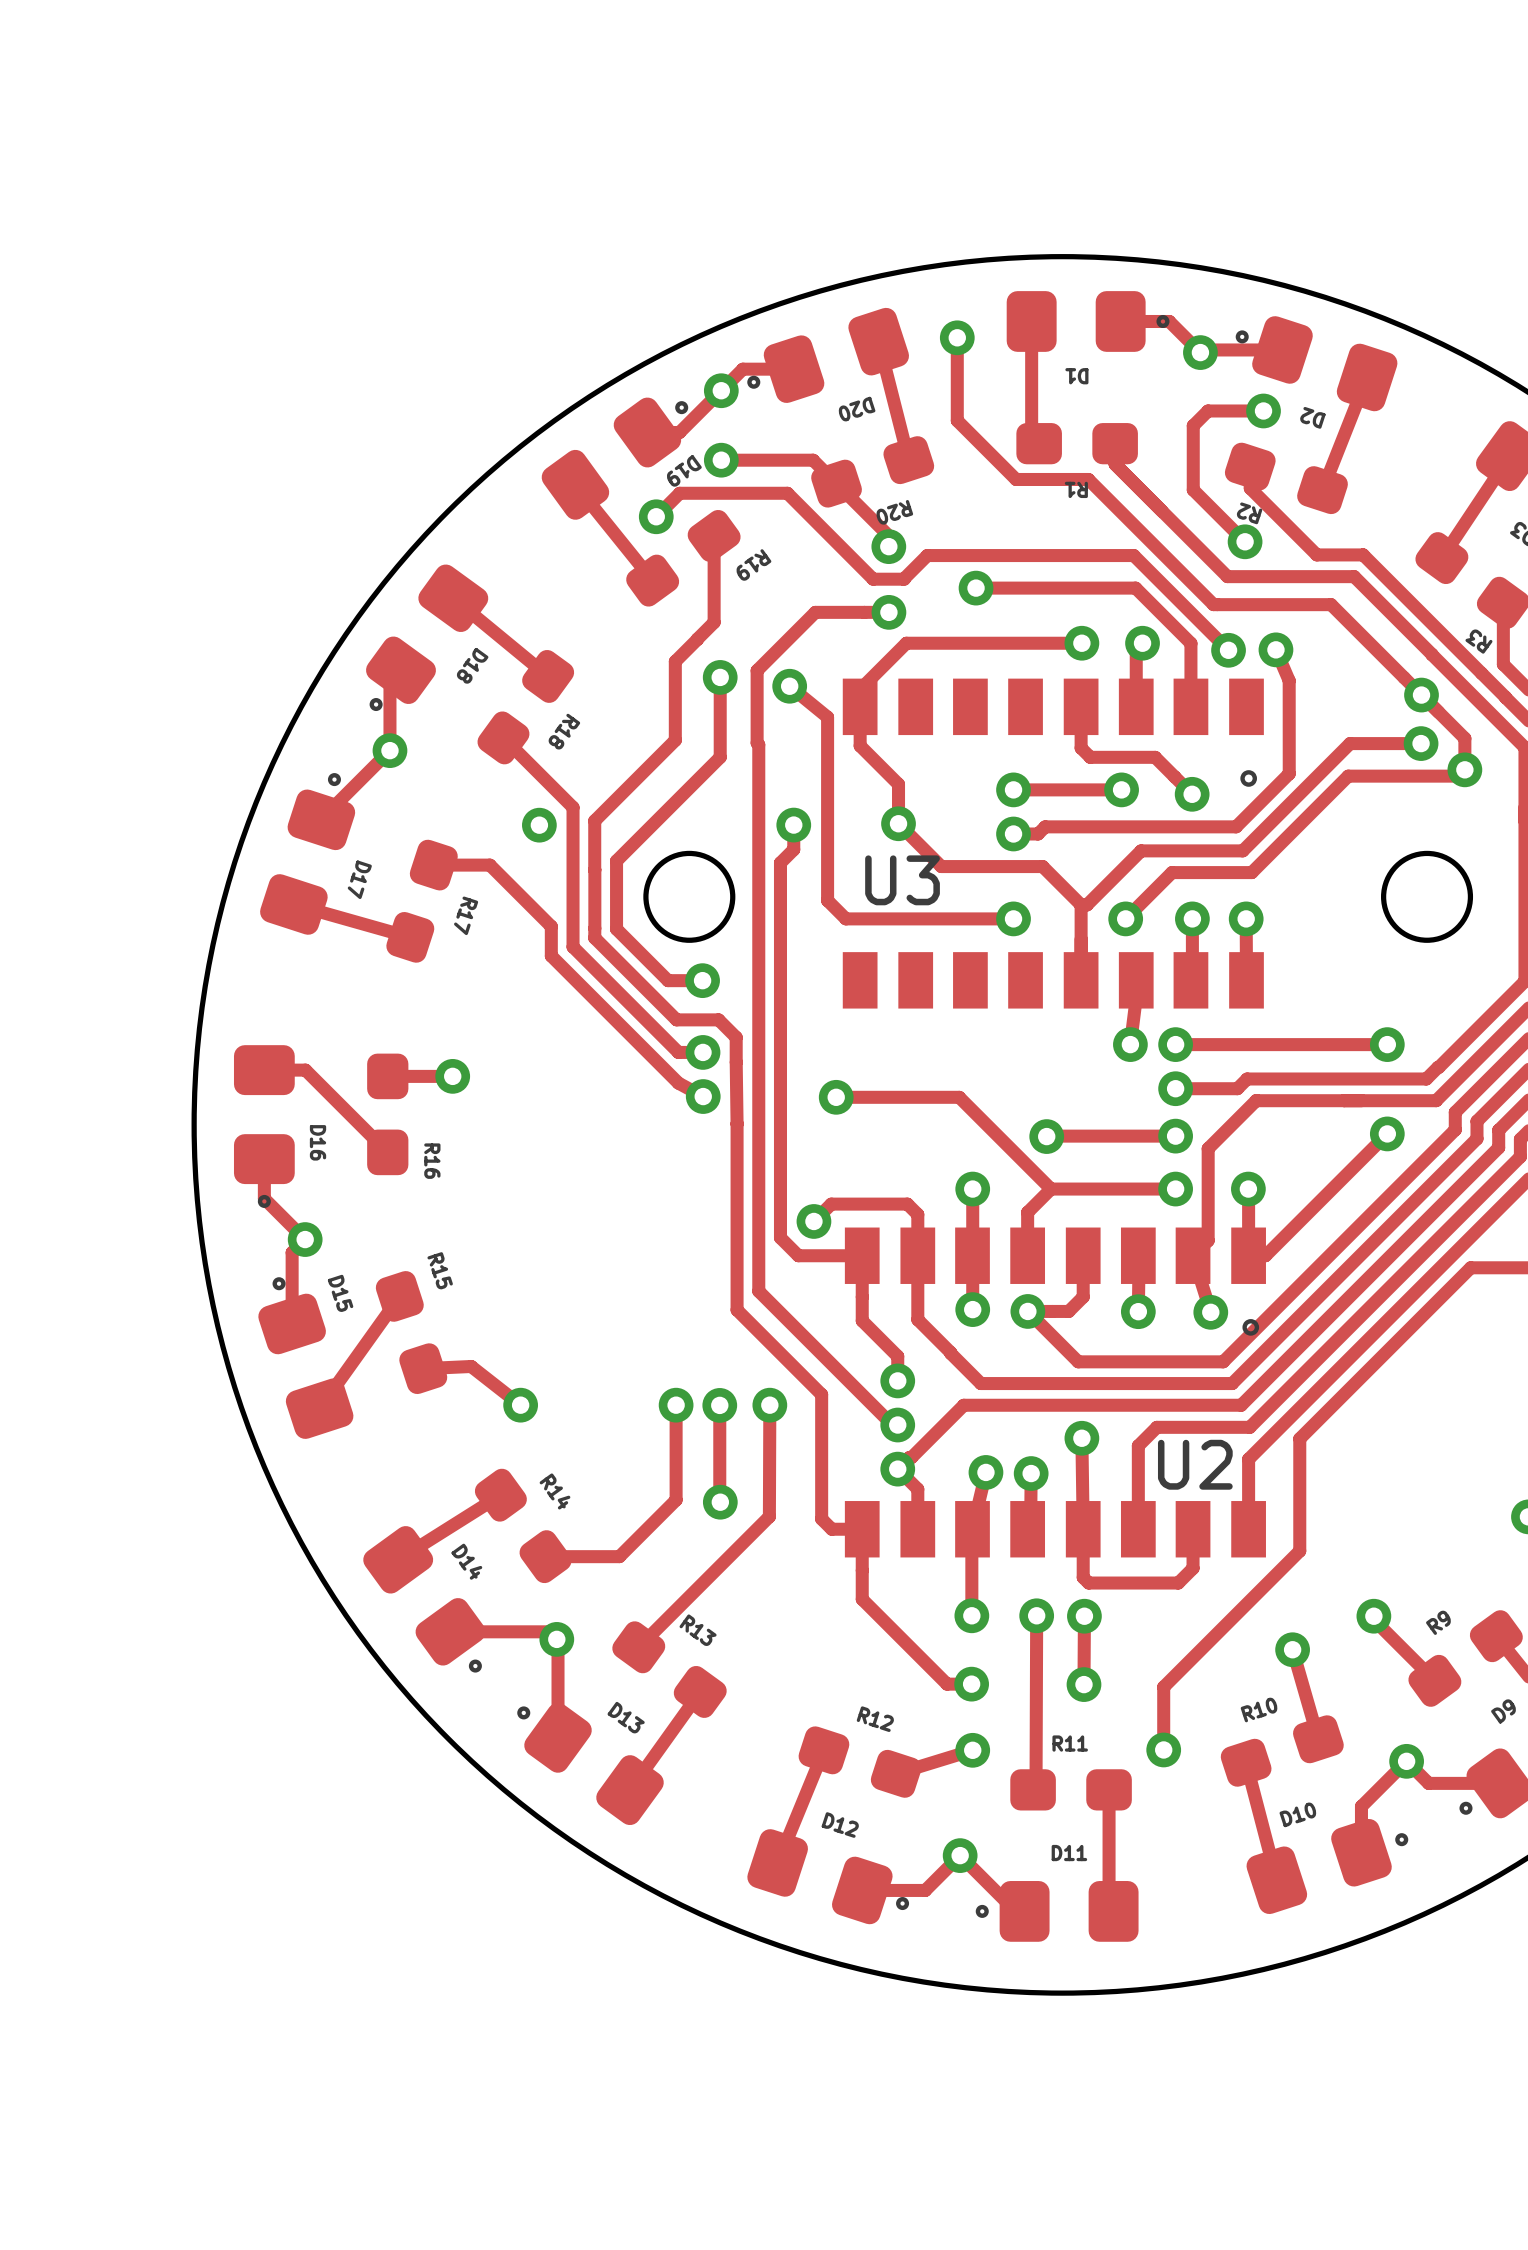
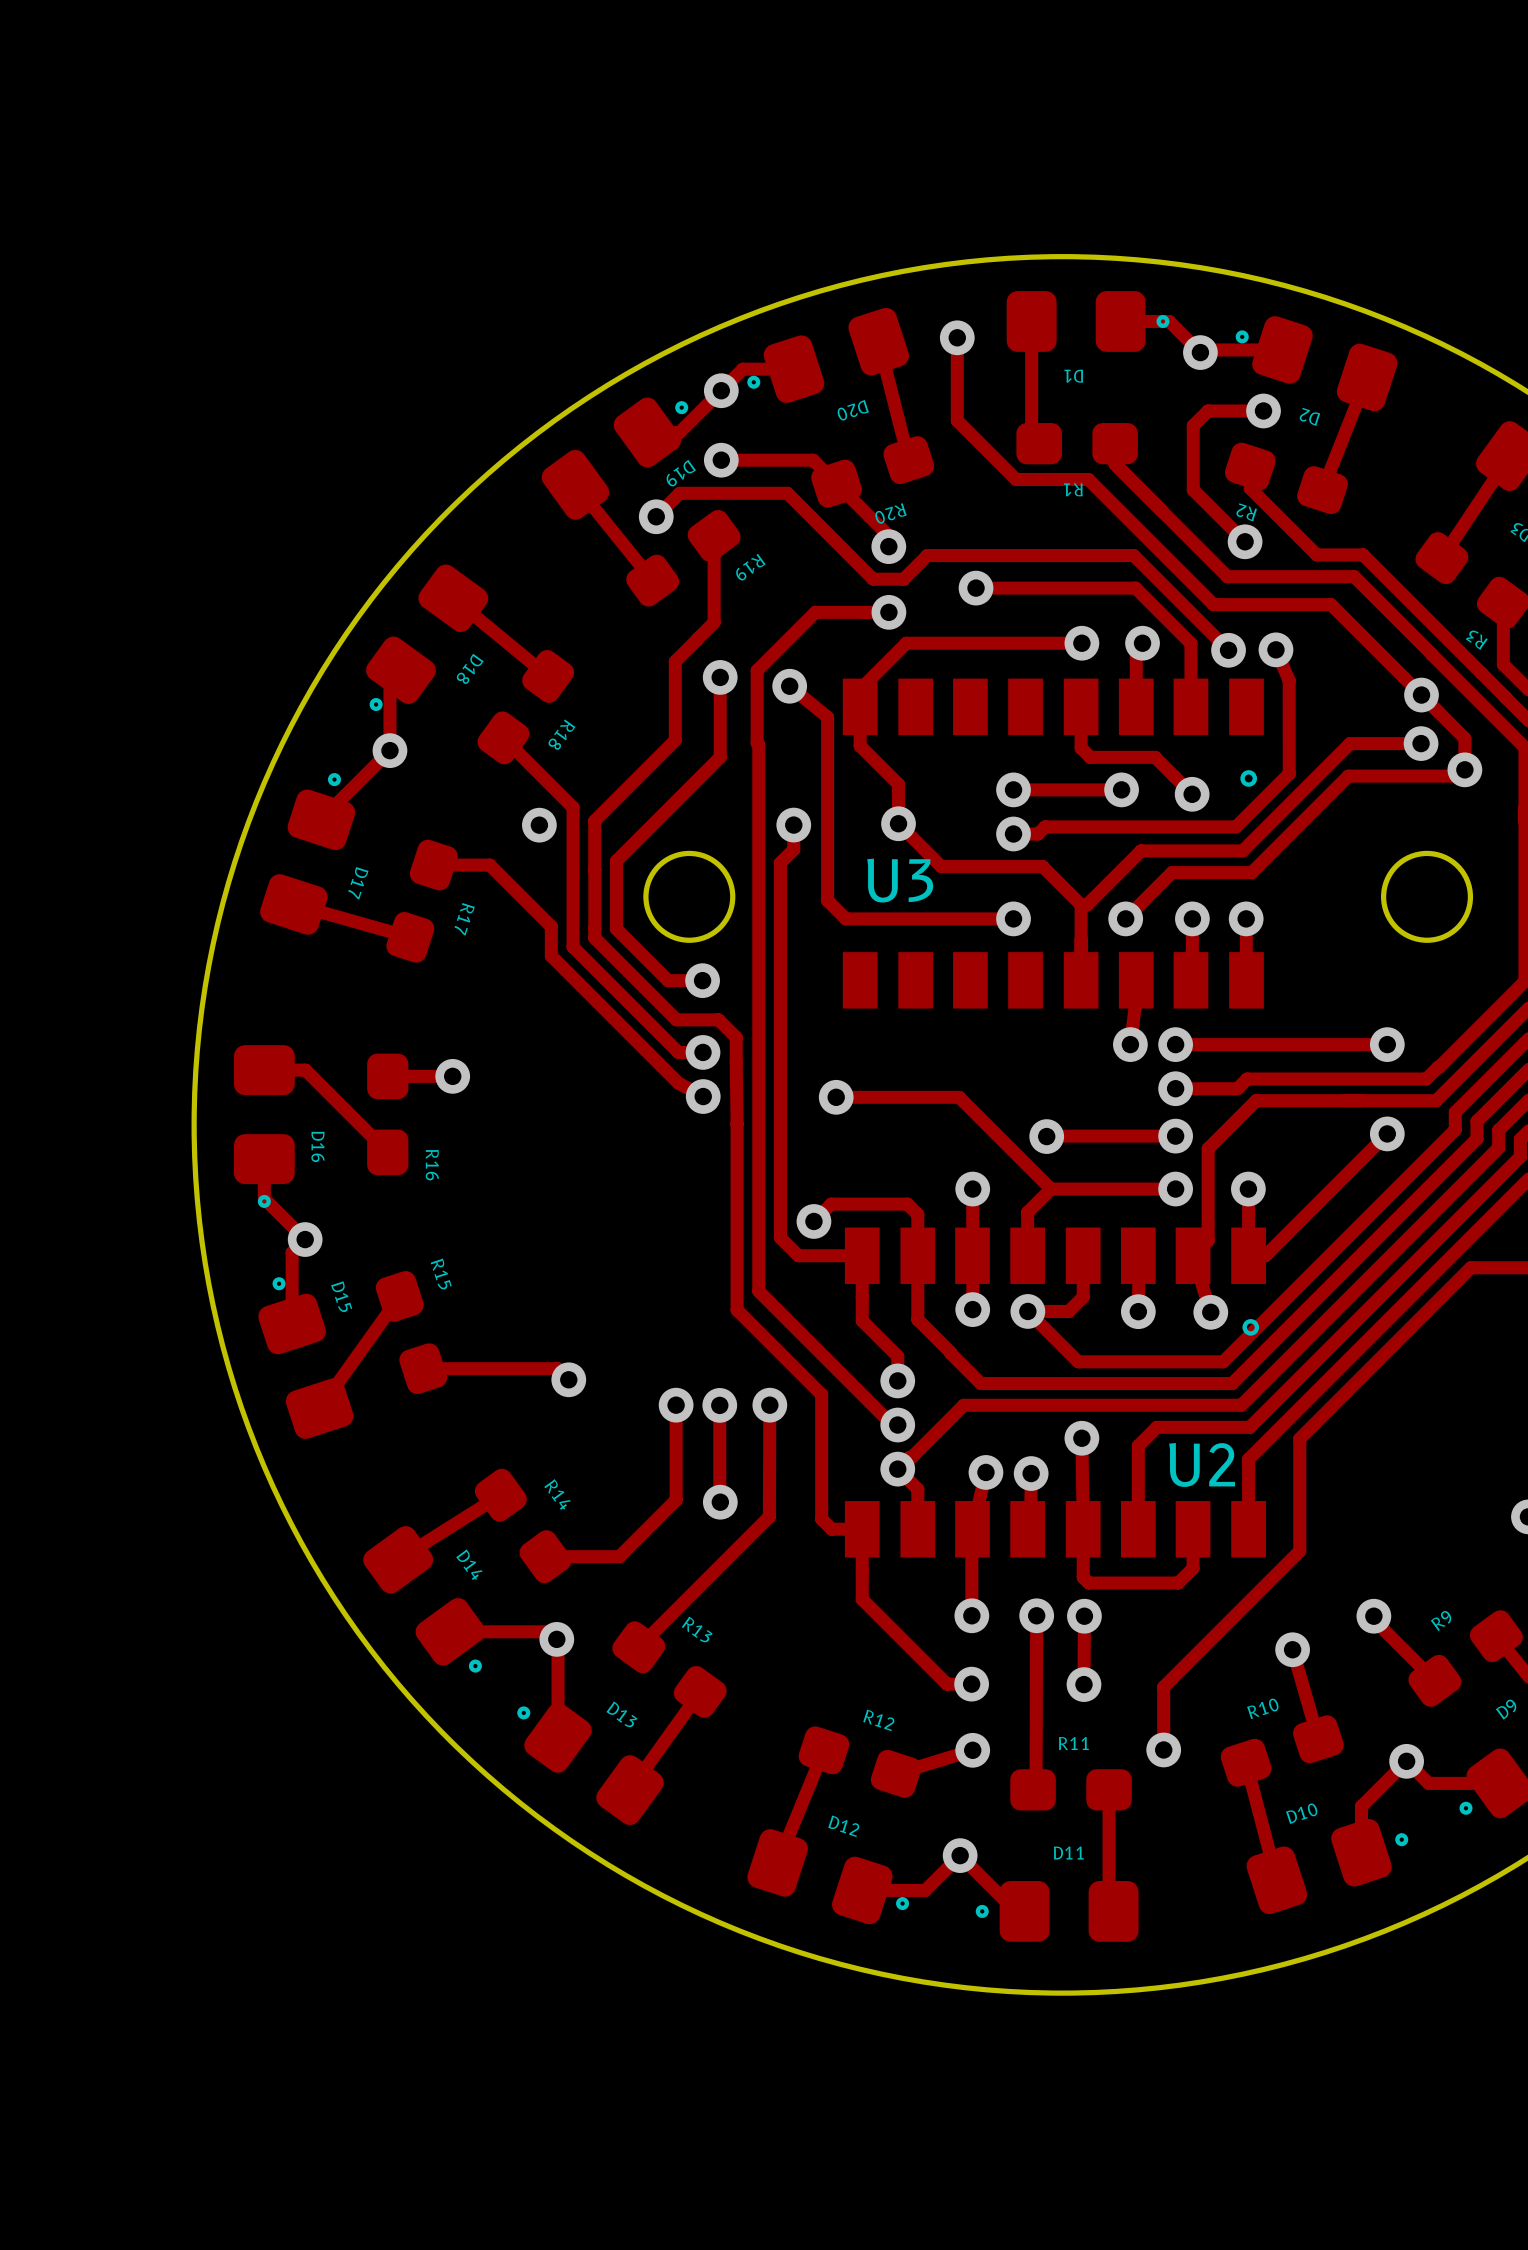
track: (423, 1368) (471, 1366) (520, 1405) -> (423, 1368) (557, 1368) (568, 1379)
via position: (520, 1405) -> (568, 1379)

